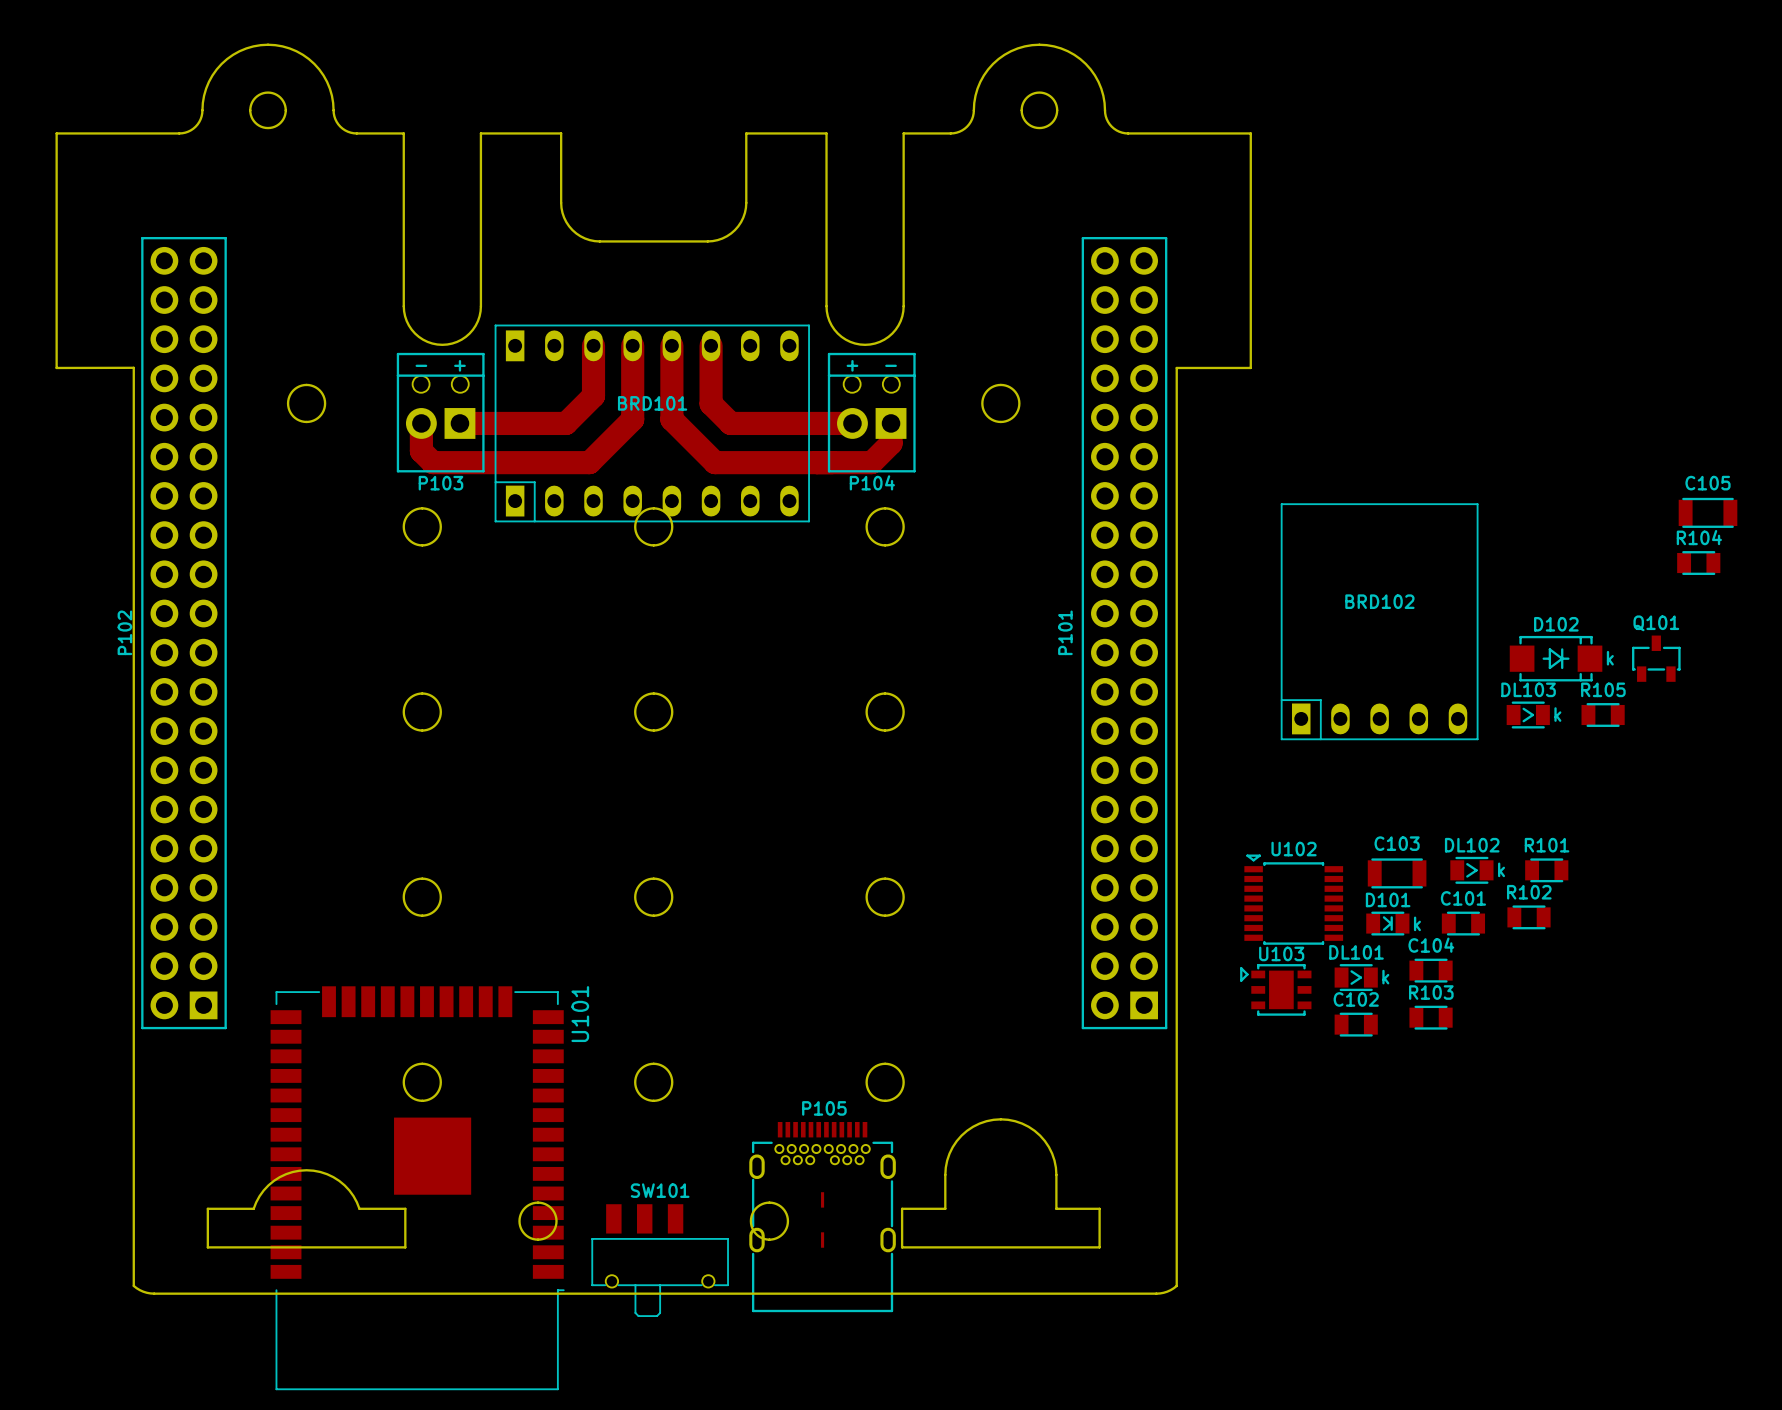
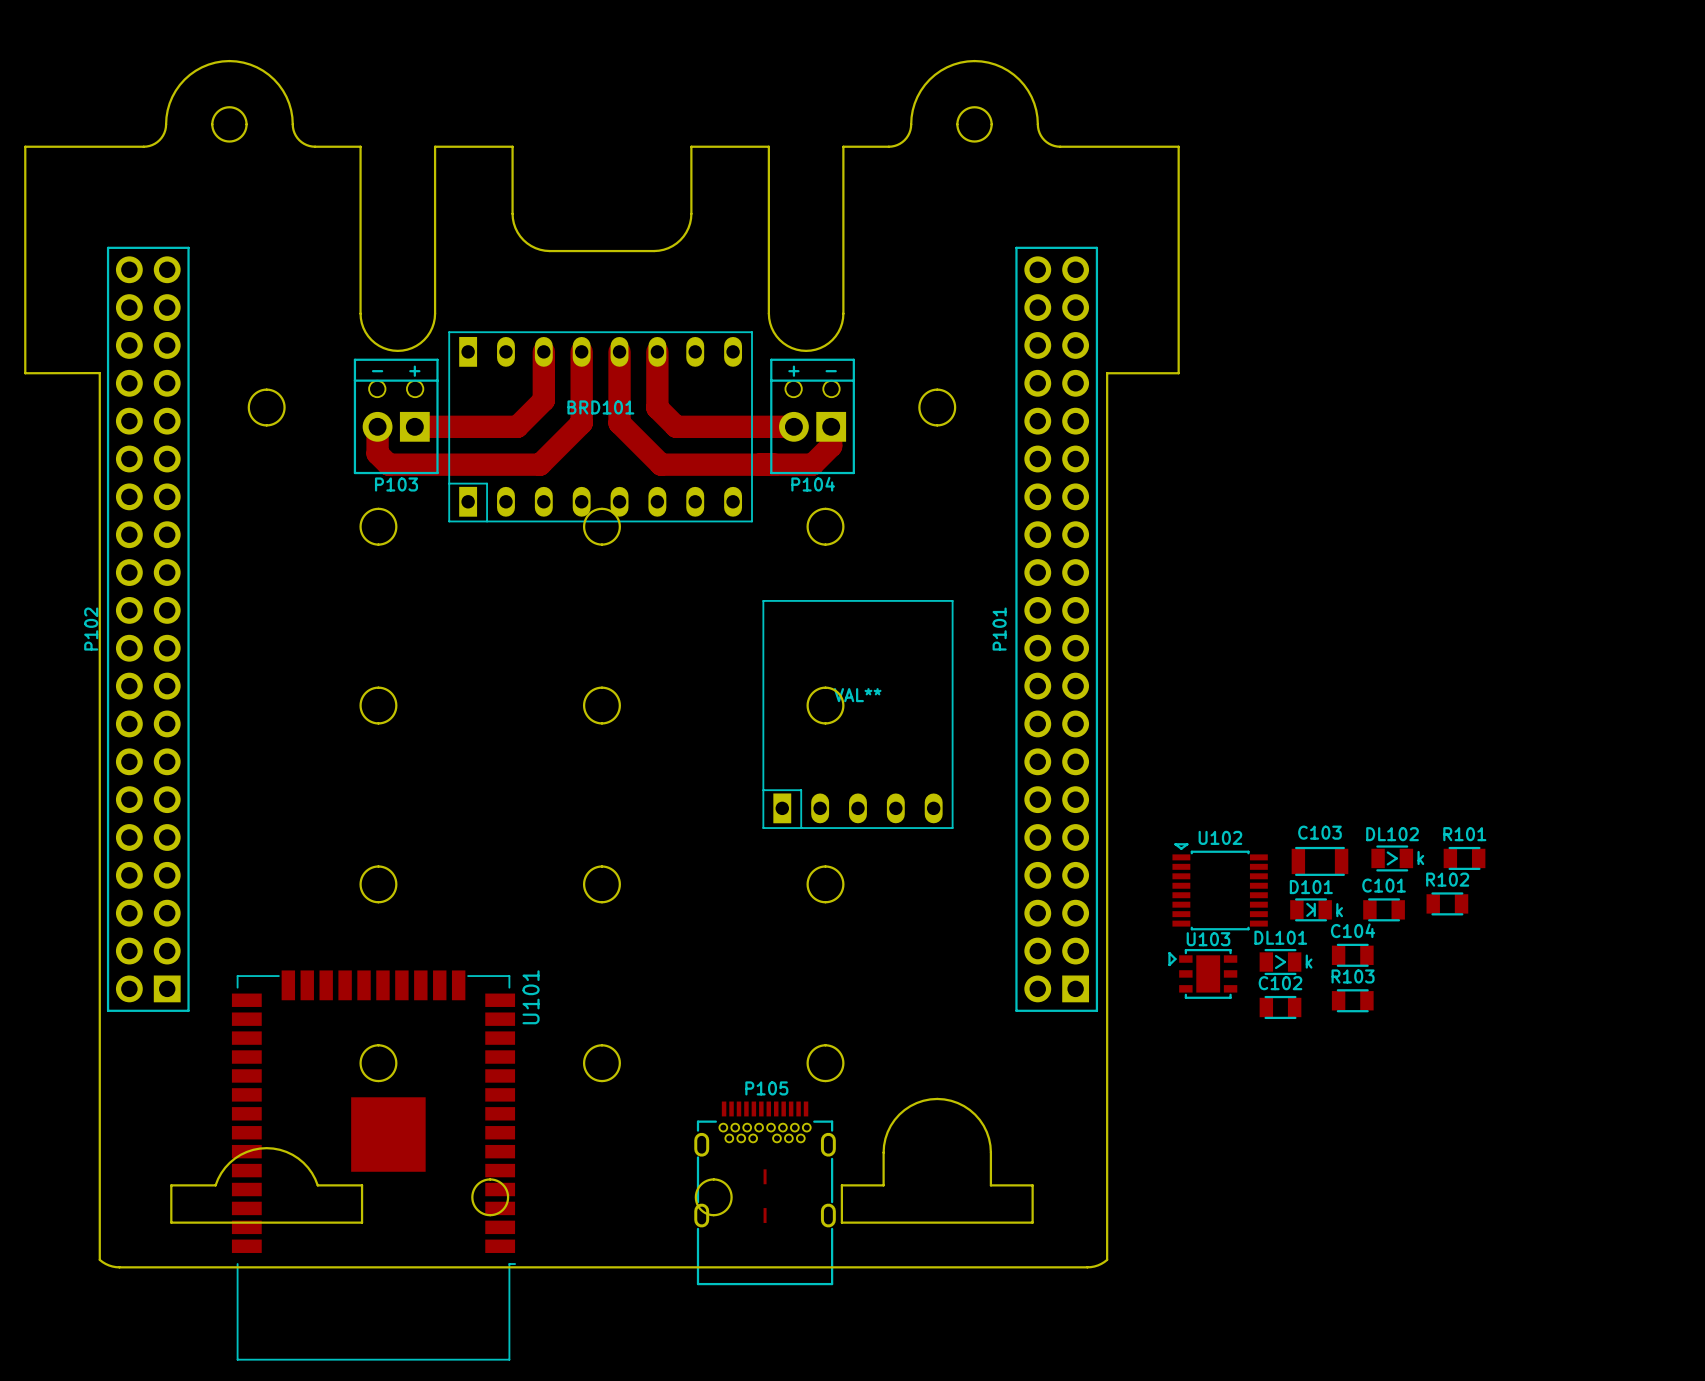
C105: (1708, 512) -> none
R104: (1698, 563) -> none
BRD102: (1379, 621) -> none
D102: (1556, 658) -> none
Q101: (1656, 658) -> none
DL103: (1528, 715) -> none
R105: (1603, 715) -> none
VAL**: none -> (857, 714)
SW101: (660, 1260) -> none

